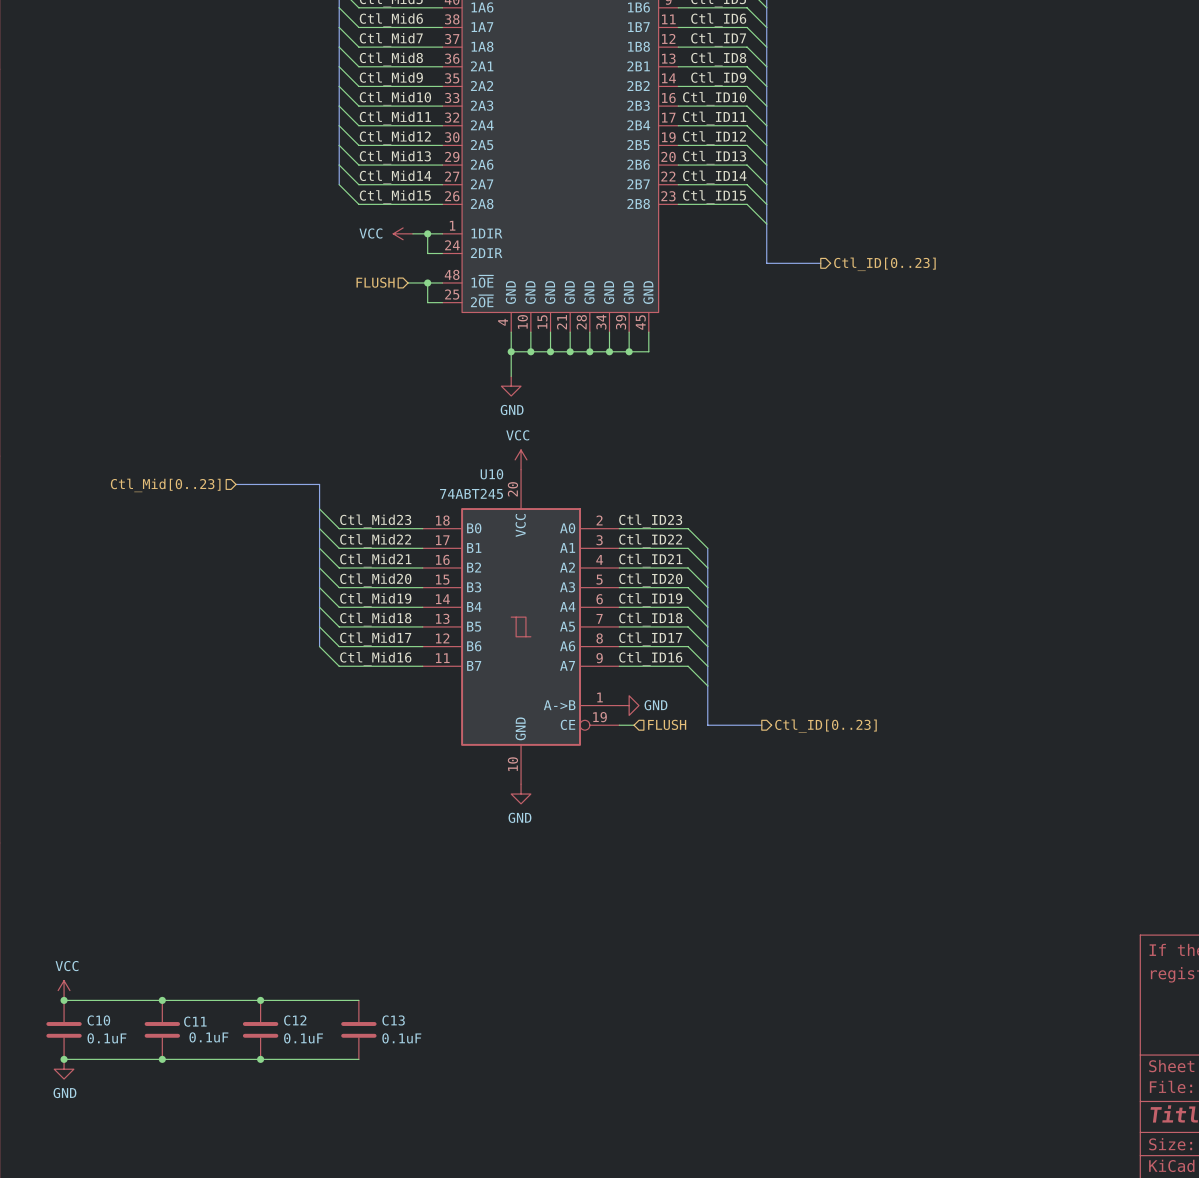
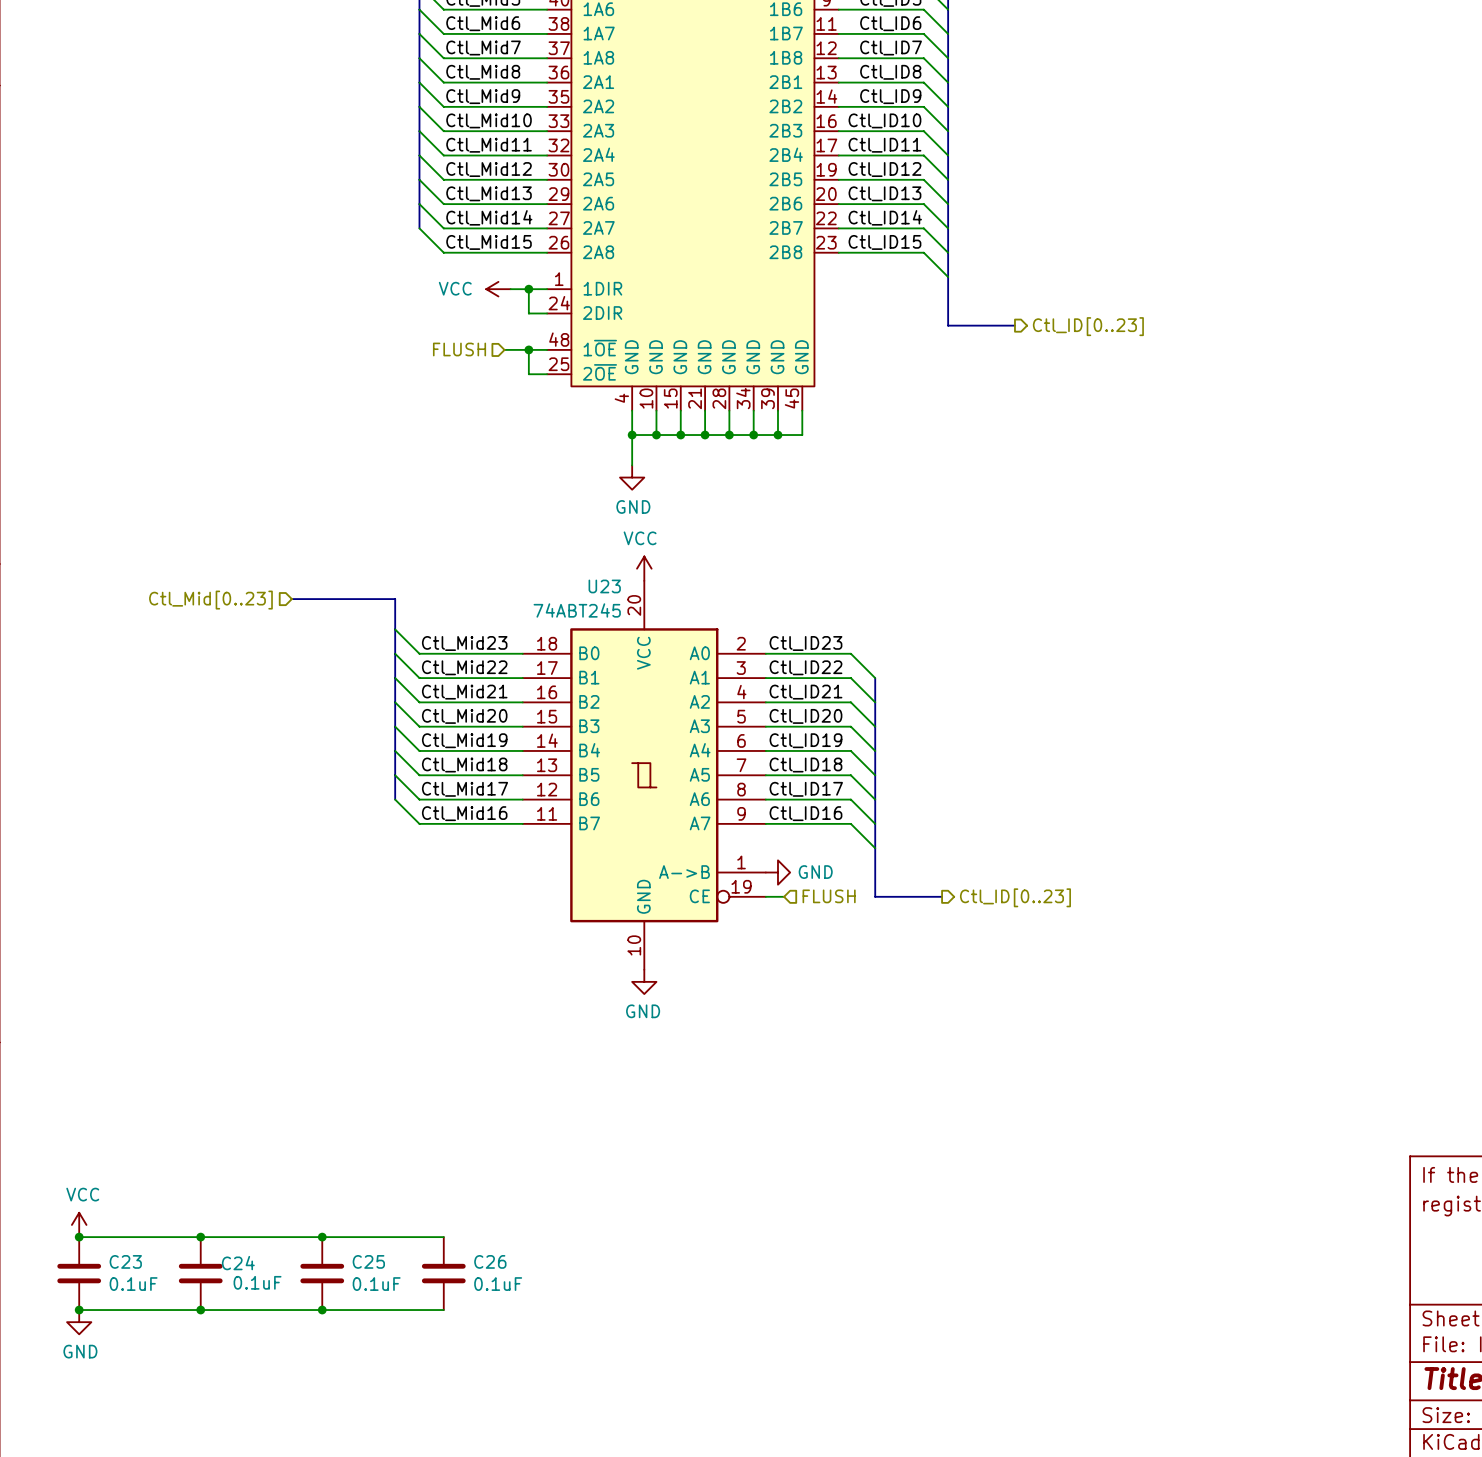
U10 name: U10 (491, 474) -> U23 (604, 586)
C10 name: C10 (98, 1020) -> C23 (125, 1261)
C12 name: C12 (295, 1020) -> C25 (368, 1261)
C13 name: C13 (393, 1020) -> C26 (490, 1261)
C11 name: C11 (195, 1021) -> C24 (238, 1263)

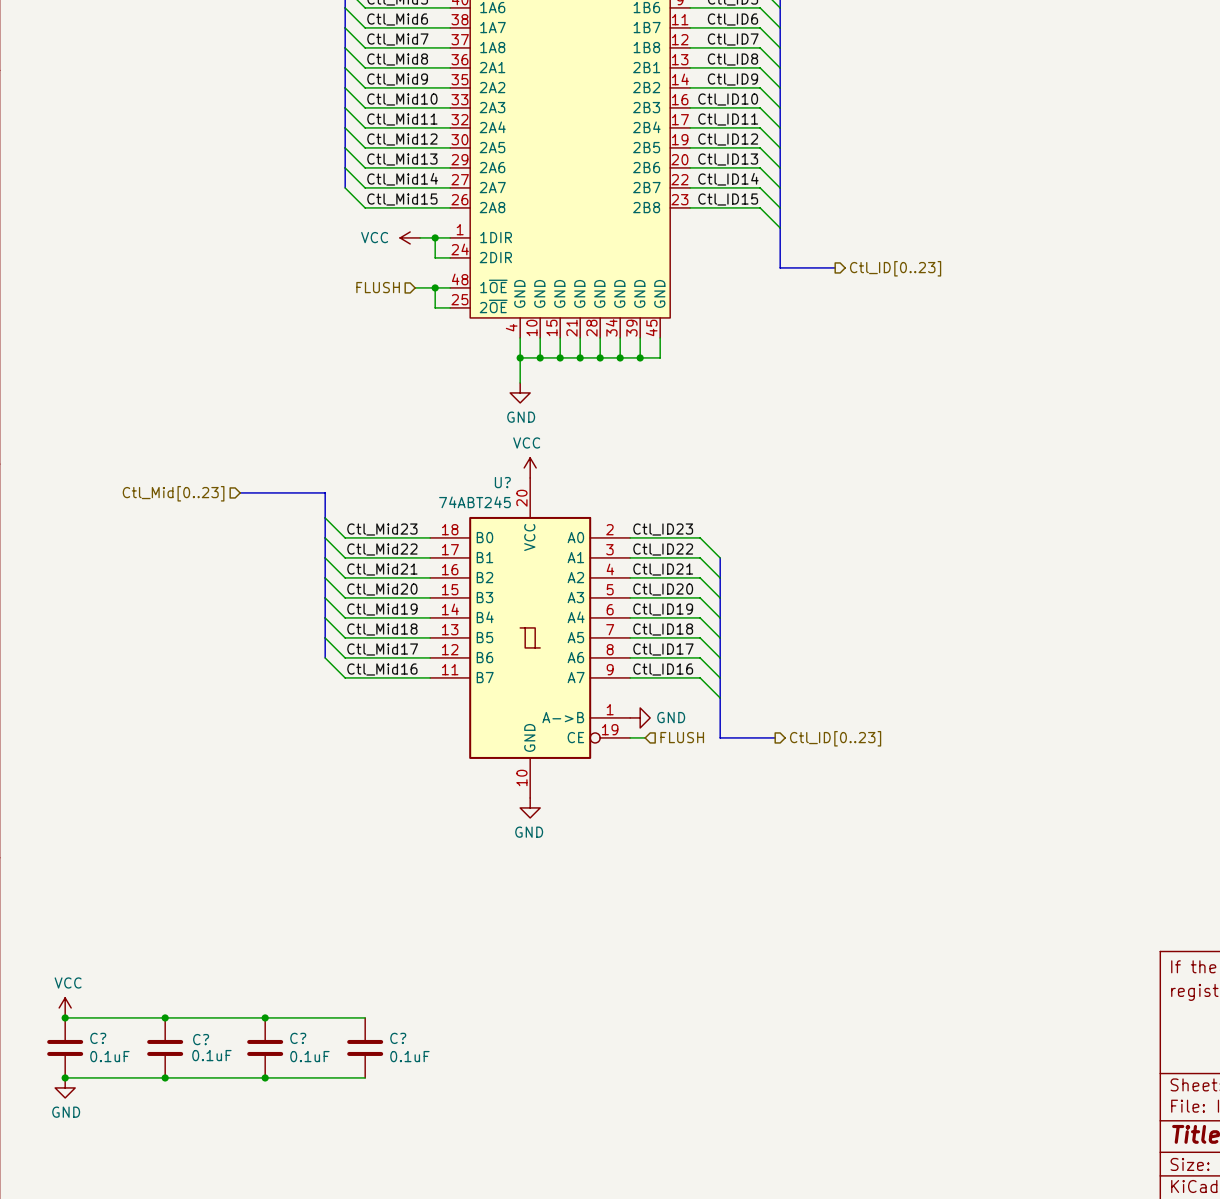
U23 name: U23 (604, 586) -> U? (502, 482)
C23 name: C23 (125, 1261) -> C? (98, 1038)
C25 name: C25 (368, 1261) -> C? (298, 1038)
C26 name: C26 (490, 1261) -> C? (398, 1038)
C24 name: C24 (238, 1263) -> C? (201, 1039)

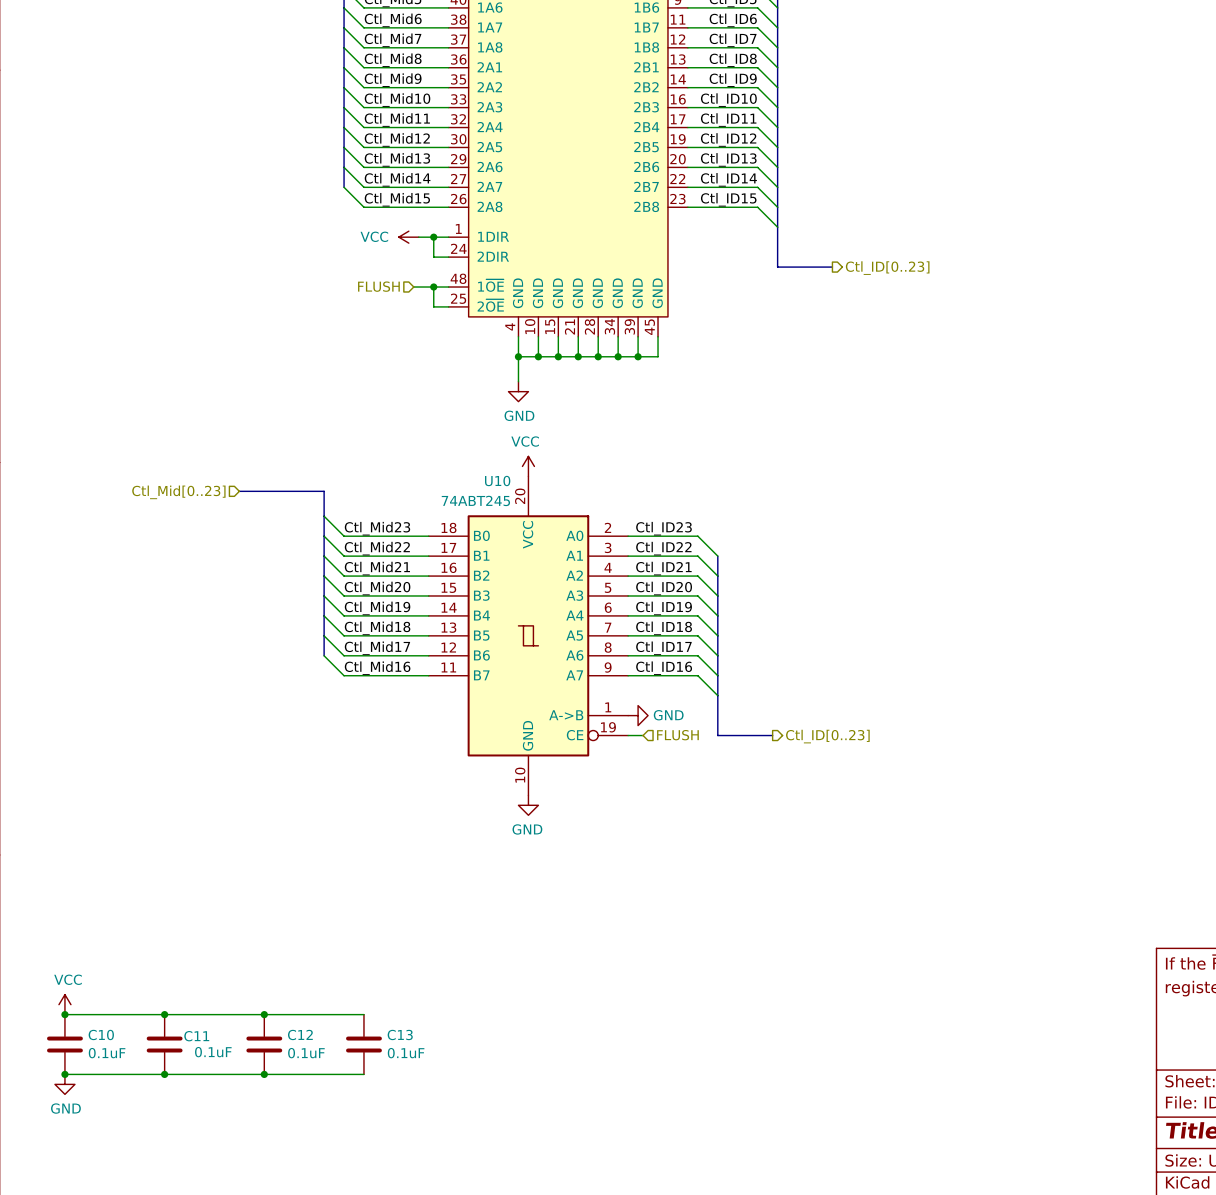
U? name: U? (502, 482) -> U10 (497, 481)
C? name: C? (98, 1038) -> C10 (101, 1034)
C? name: C? (298, 1038) -> C12 (300, 1034)
C? name: C? (398, 1038) -> C13 (400, 1034)
C? name: C? (201, 1039) -> C11 (196, 1036)

